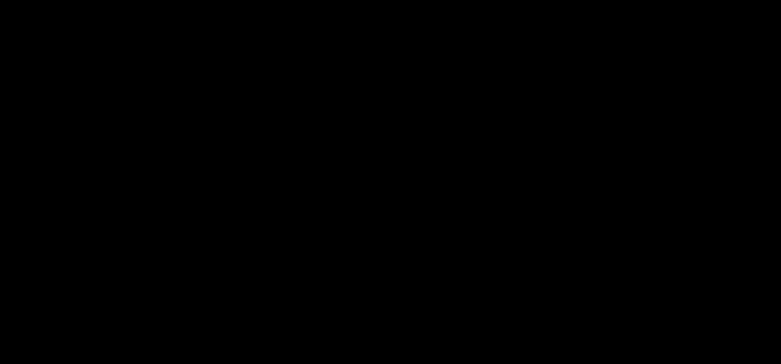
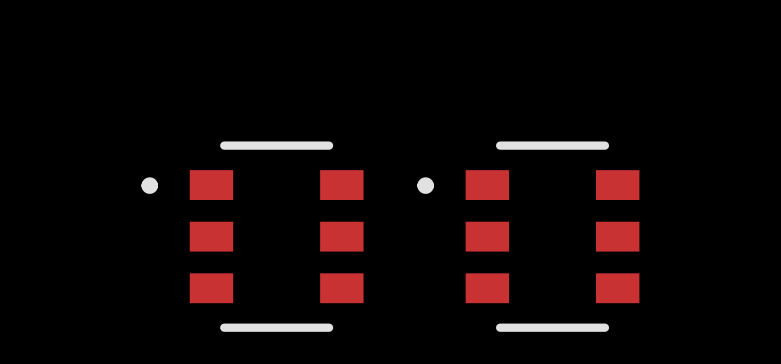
part: none -> (252, 236)
part: none -> (528, 236)

